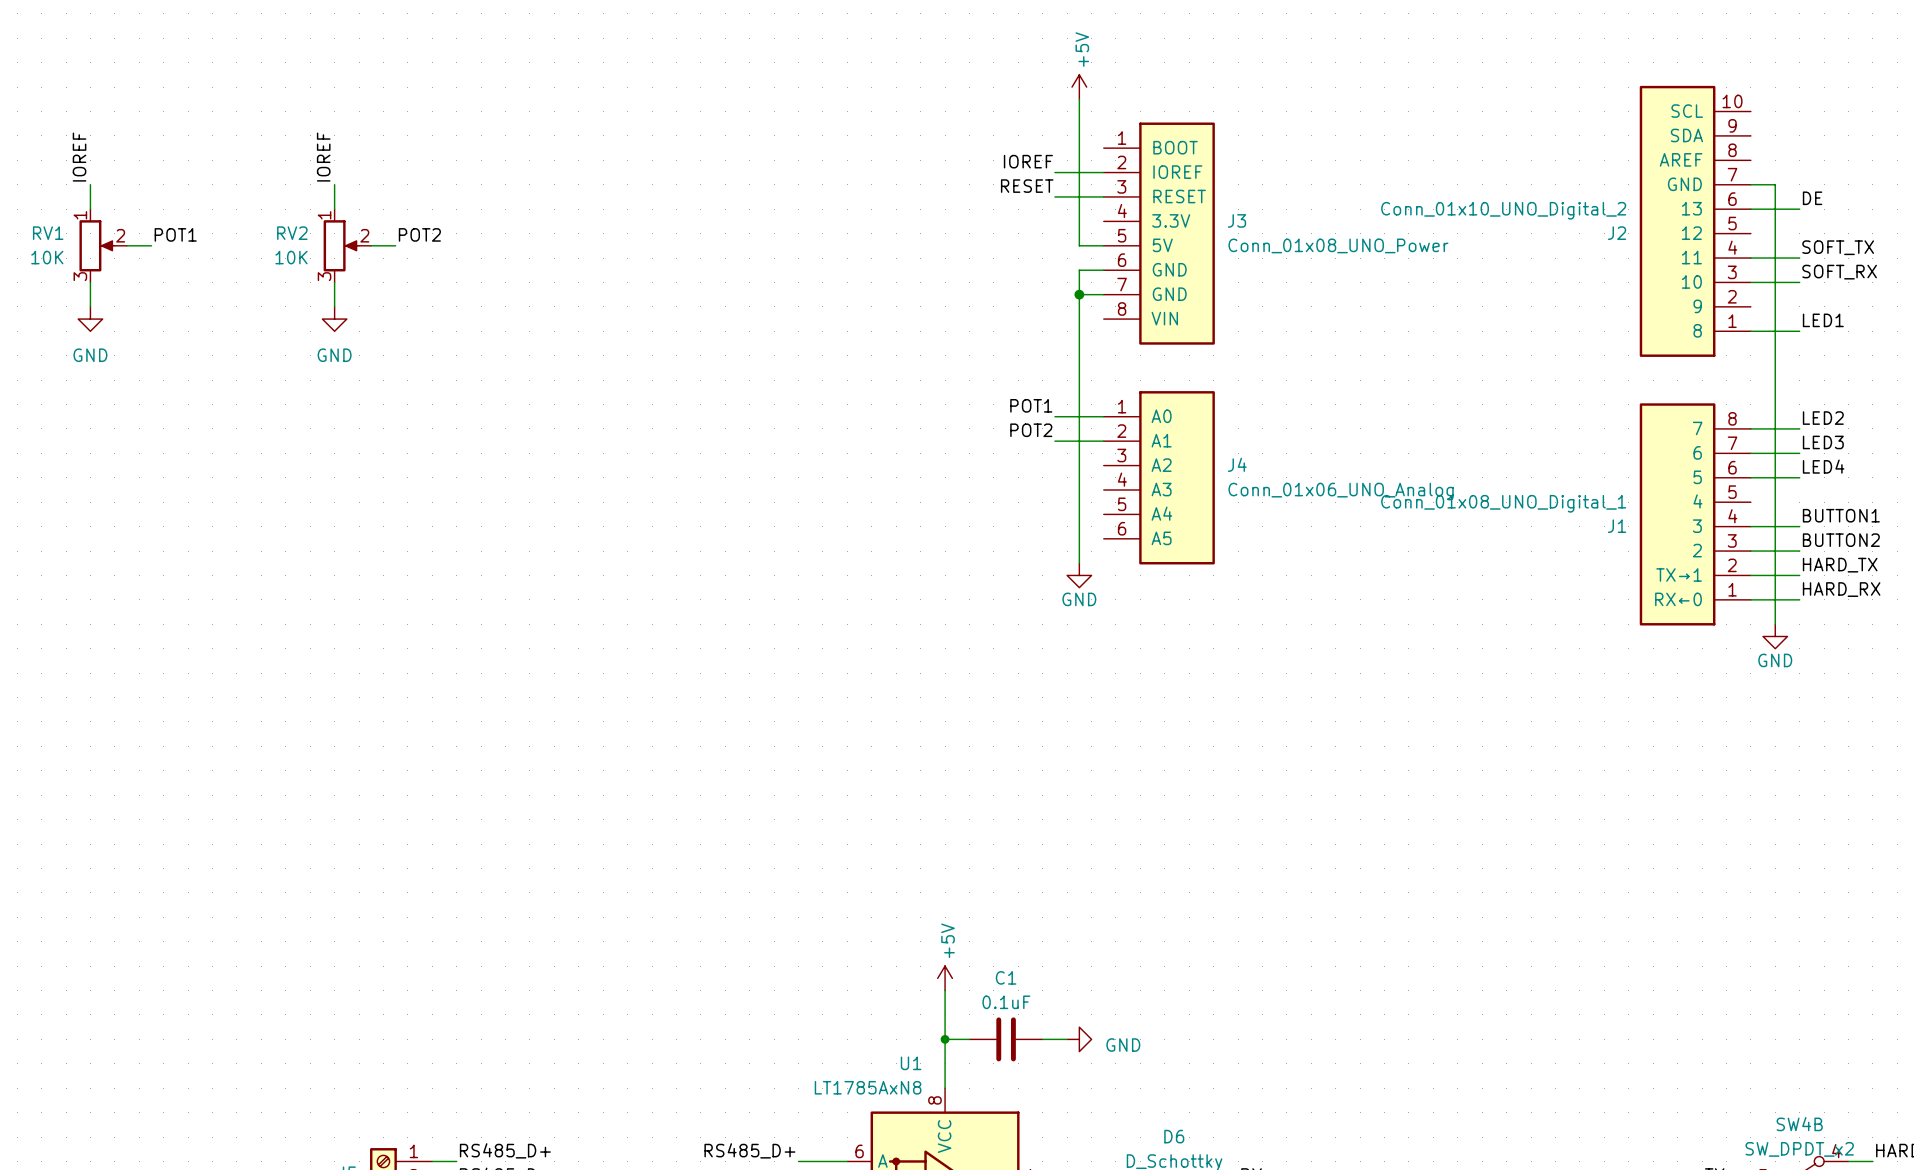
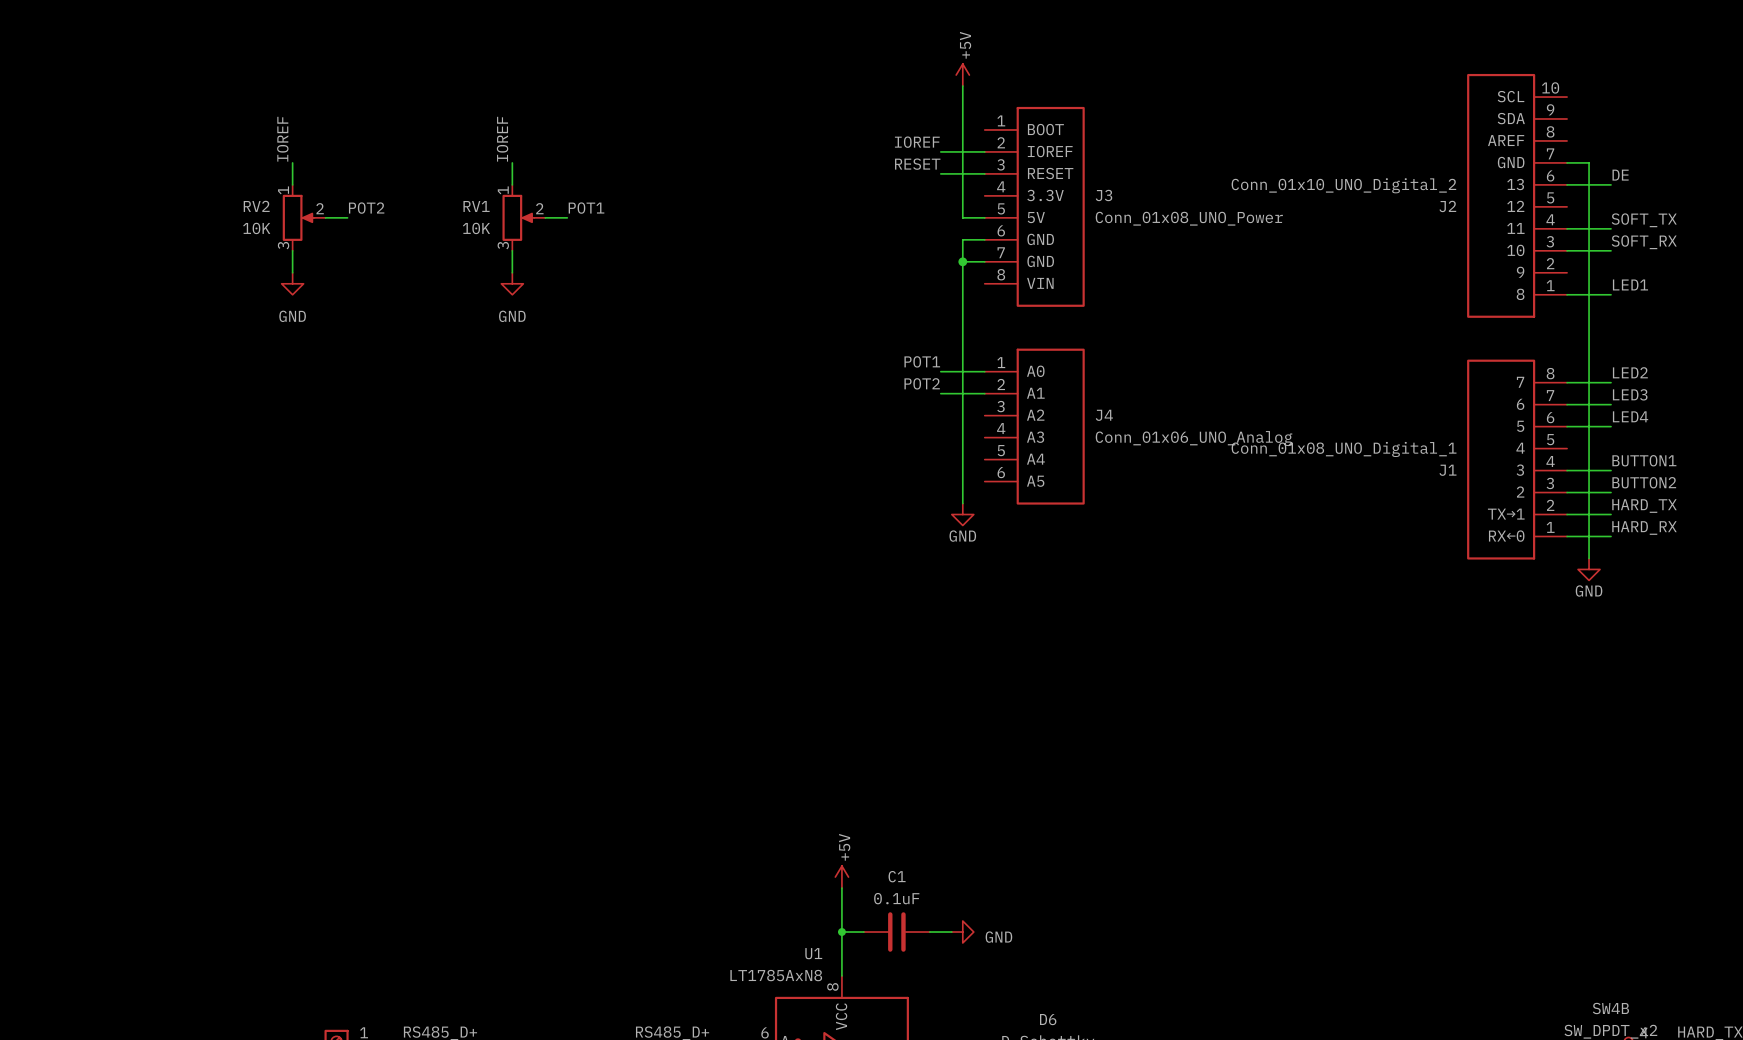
label: IOREF (79, 157) -> none
label: none -> IOREF (502, 139)
wire: (90, 184) (90, 209) -> none
wire: none -> (512, 162) (512, 184)
label: POT1 (175, 234) -> none
label: none -> POT1 (586, 208)
RV1 position: (103, 245) -> (523, 217)
wire: (127, 245) (151, 245) -> none
wire: none -> (545, 217) (567, 217)
wire: (90, 282) (90, 306) -> none
wire: none -> (512, 250) (512, 272)
power symbol: GND (90, 319) -> none
power symbol: none -> GND (512, 283)

